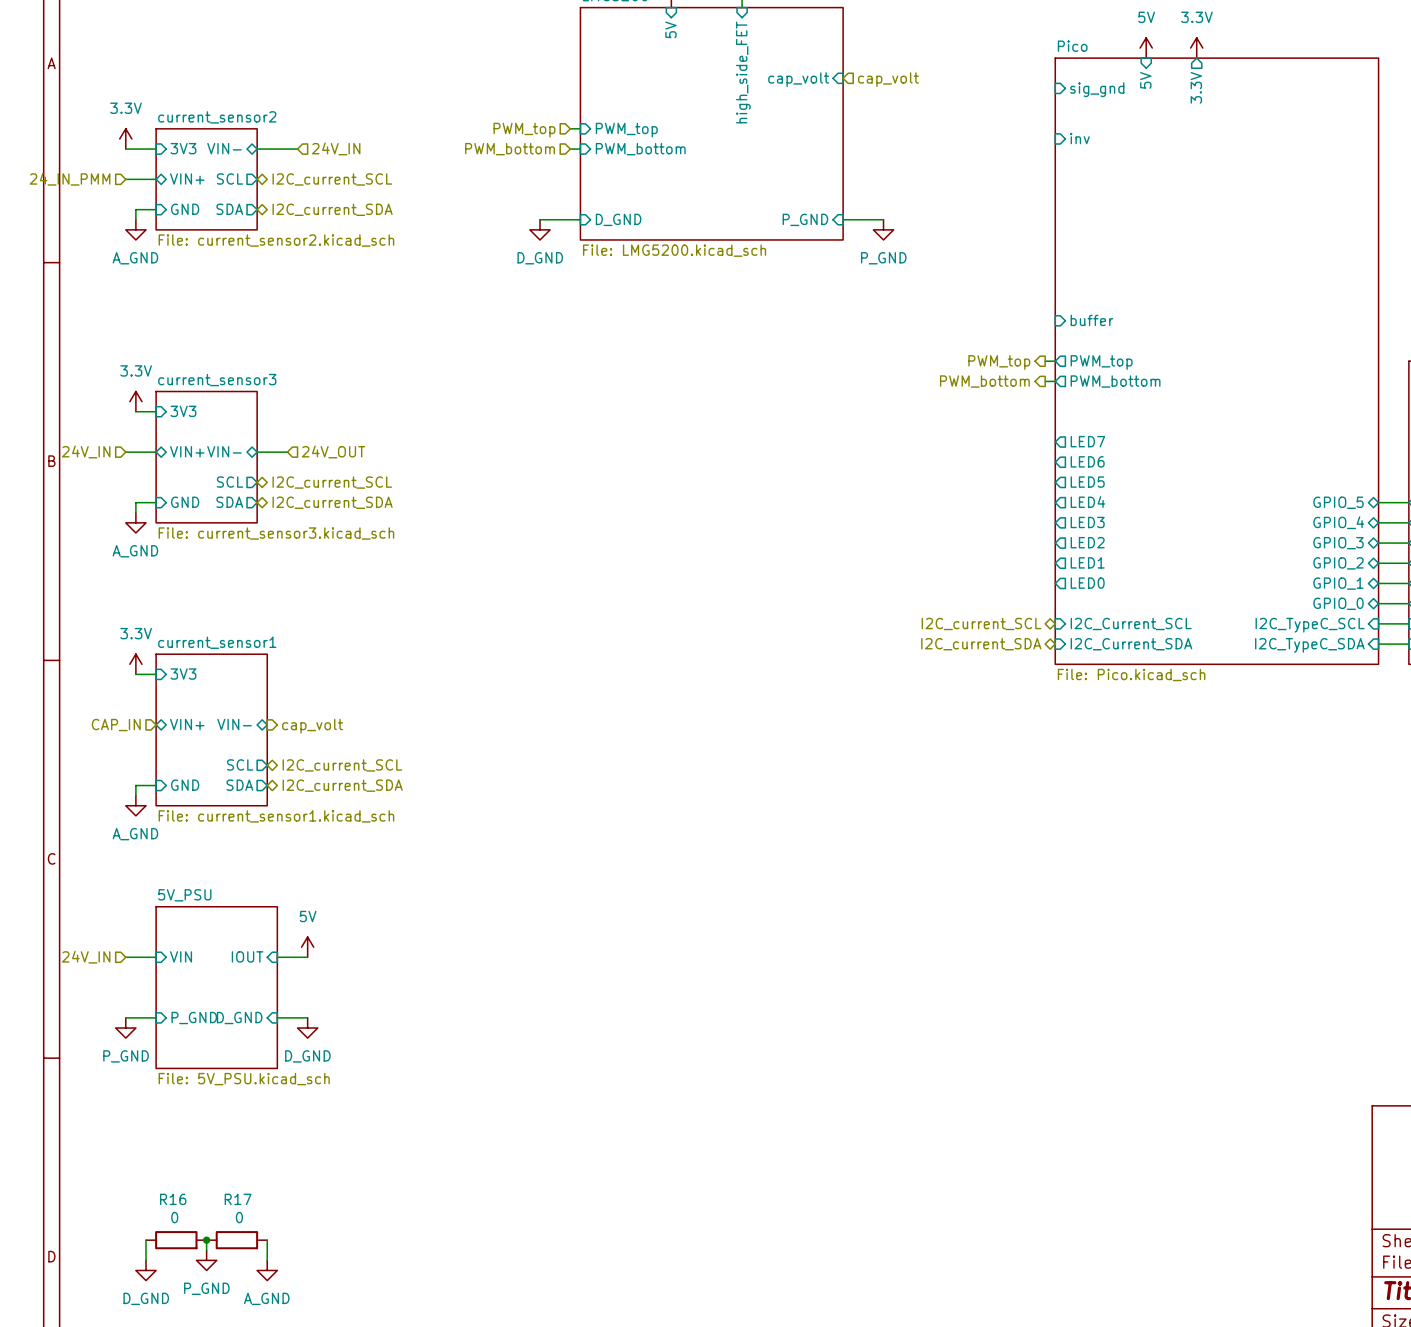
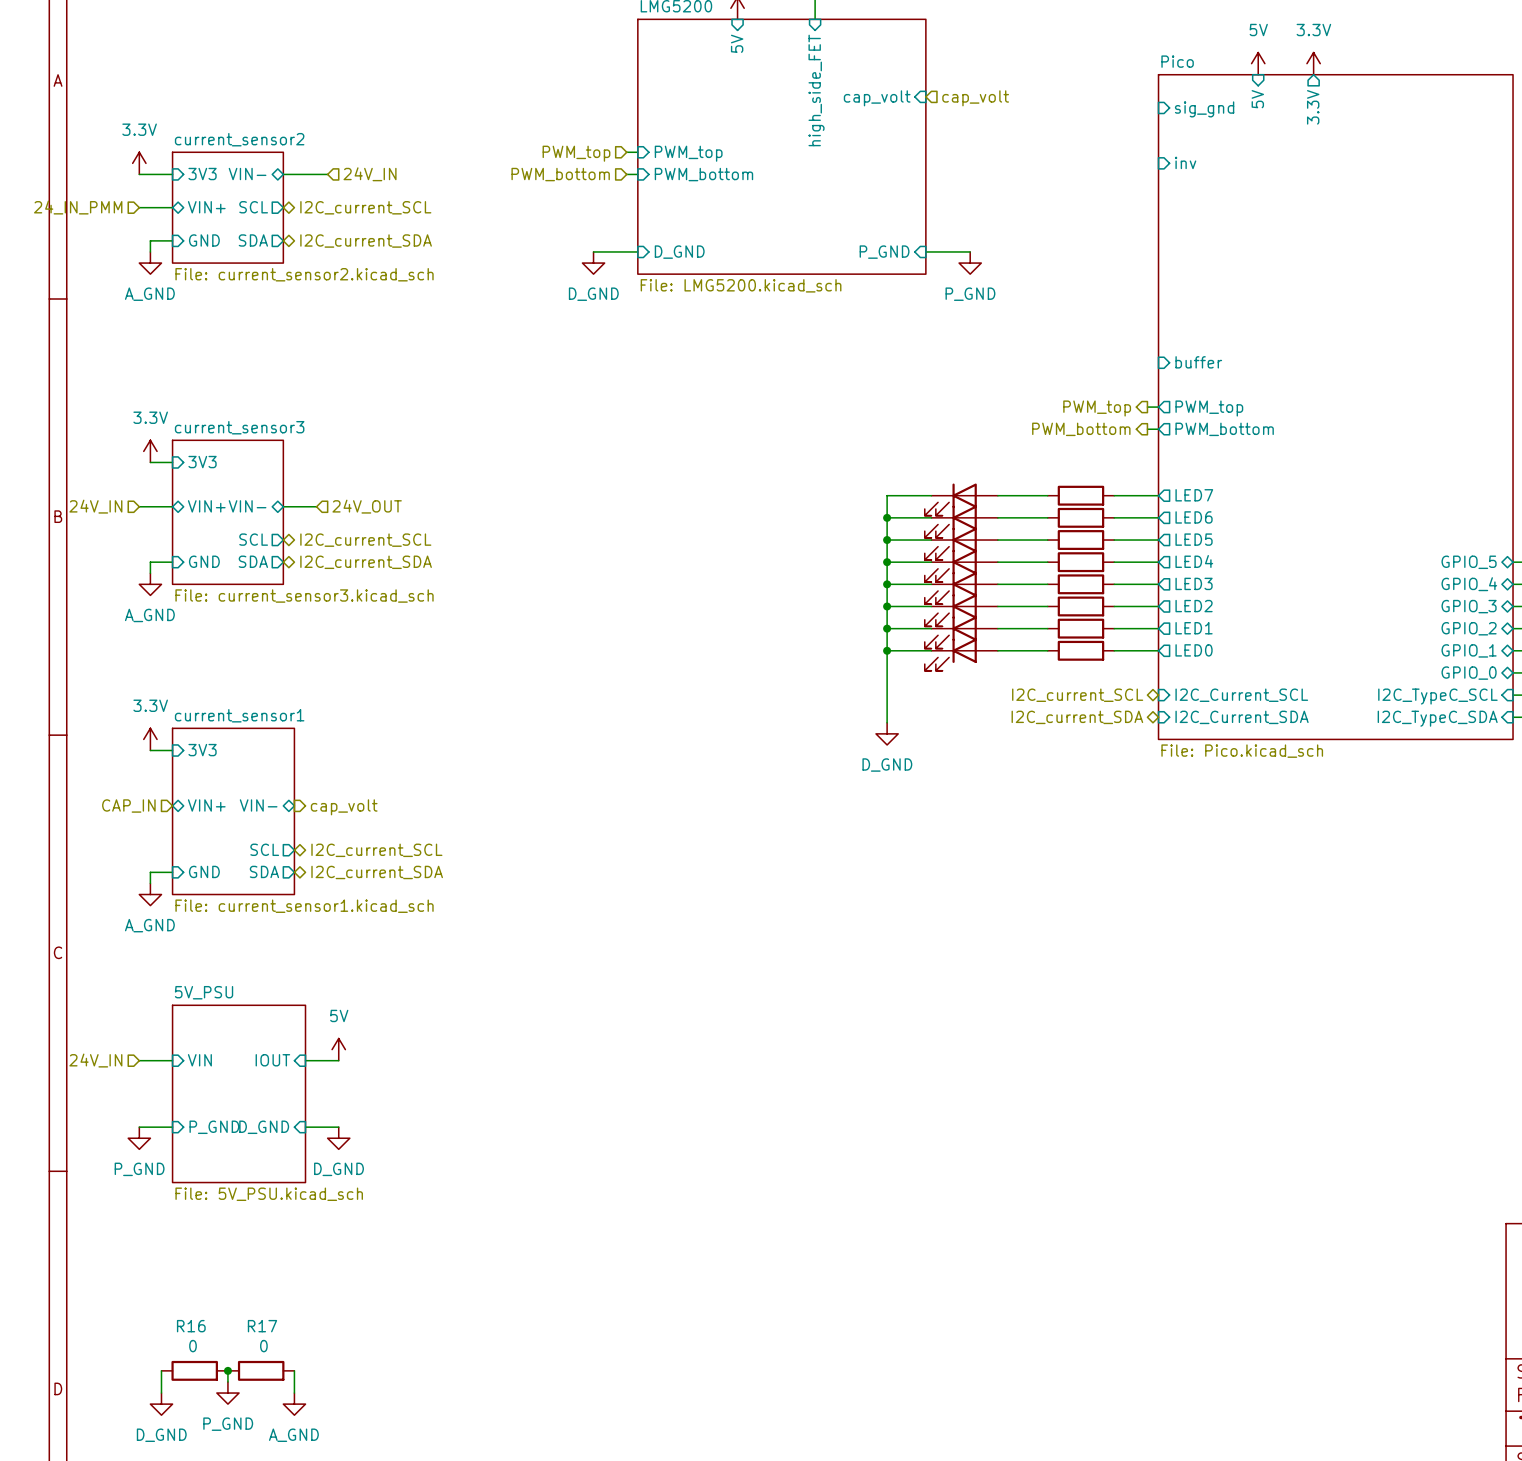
wire: none -> (931, 495) (887, 495) (887, 722)
wire: none -> (997, 495) (1047, 495)
part: none -> (1080, 495)
wire: none -> (1114, 495) (1158, 495)
part: none -> (961, 499)
wire: none -> (887, 517) (931, 517)
junction: none -> (887, 517)
wire: none -> (997, 517) (1047, 517)
part: none -> (1080, 517)
wire: none -> (1114, 517) (1158, 517)
part: none -> (961, 521)
wire: none -> (887, 540) (931, 540)
junction: none -> (887, 540)
wire: none -> (997, 540) (1047, 540)
part: none -> (1080, 540)
wire: none -> (1114, 540) (1158, 540)
part: none -> (961, 543)
wire: none -> (887, 562) (931, 562)
junction: none -> (887, 562)
wire: none -> (997, 562) (1047, 562)
part: none -> (1080, 562)
wire: none -> (1114, 562) (1158, 562)
part: none -> (961, 566)
wire: none -> (887, 584) (931, 584)
junction: none -> (887, 584)
wire: none -> (997, 584) (1047, 584)
part: none -> (1080, 584)
wire: none -> (1114, 584) (1158, 584)
part: none -> (961, 588)
wire: none -> (887, 606) (931, 606)
junction: none -> (887, 606)
wire: none -> (997, 606) (1047, 606)
part: none -> (1080, 606)
wire: none -> (1114, 606) (1158, 606)
part: none -> (961, 610)
wire: none -> (887, 628) (931, 628)
junction: none -> (887, 628)
wire: none -> (997, 628) (1047, 628)
part: none -> (1080, 628)
wire: none -> (1114, 628) (1158, 628)
part: none -> (961, 632)
wire: none -> (887, 650) (931, 650)
junction: none -> (887, 650)
wire: none -> (997, 650) (1047, 650)
part: none -> (1080, 650)
wire: none -> (1114, 650) (1158, 650)
part: none -> (961, 654)
power symbol: none -> D_GND (887, 733)

